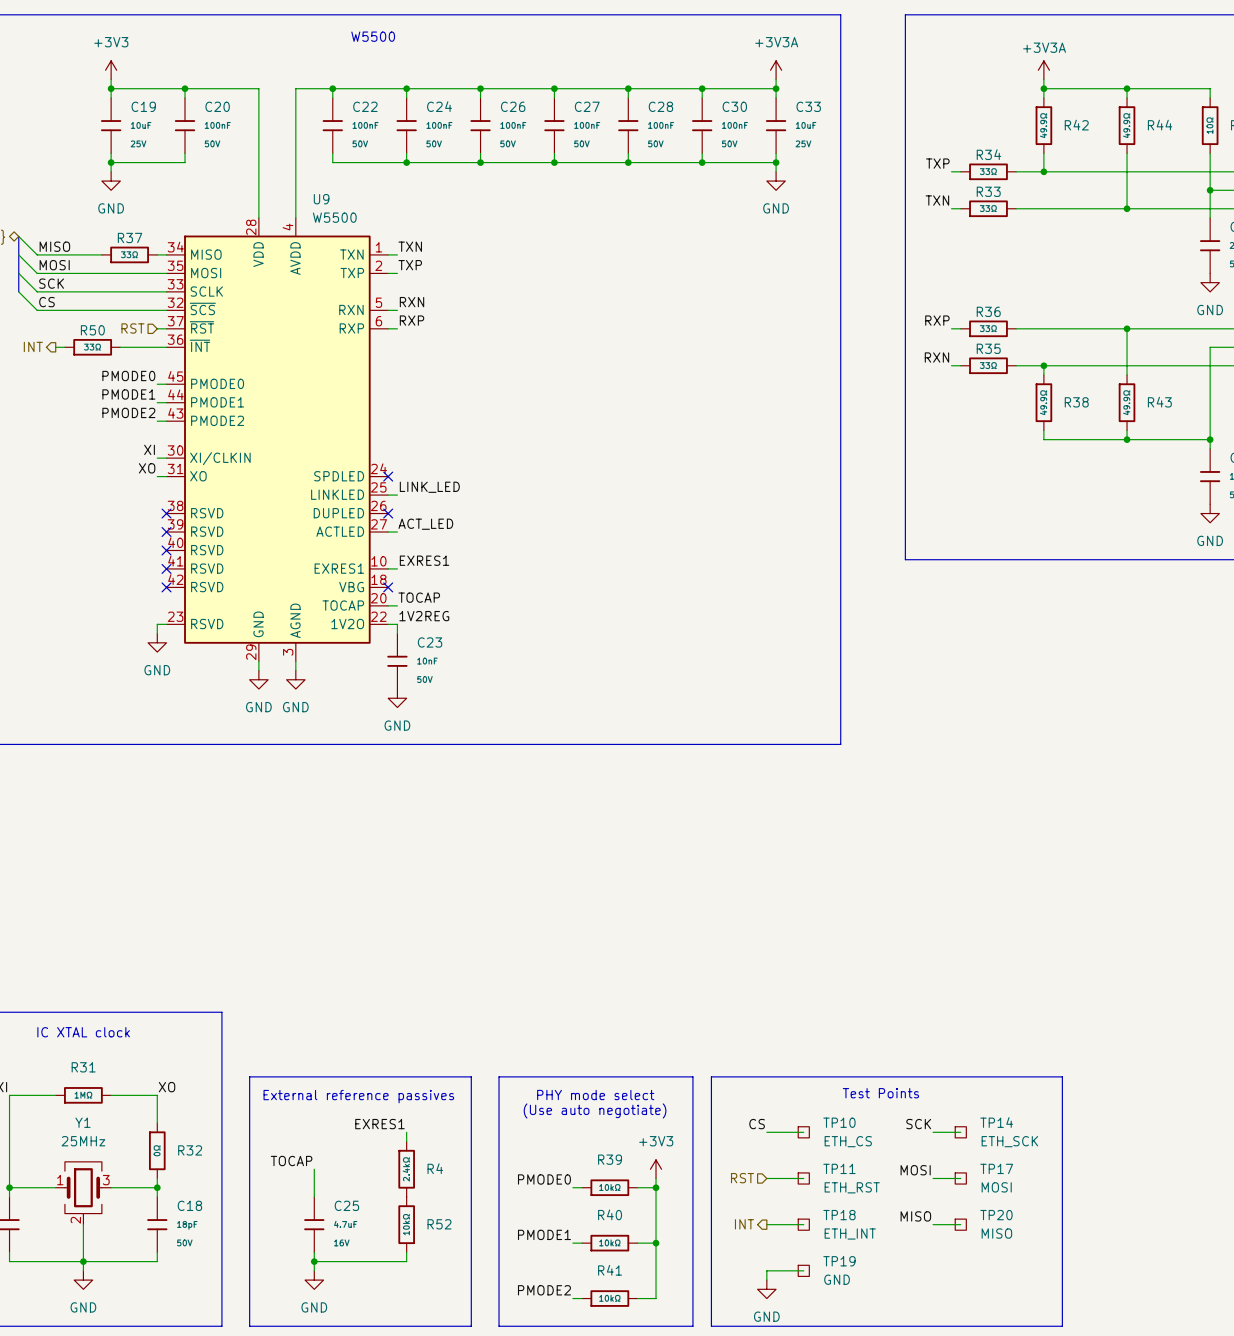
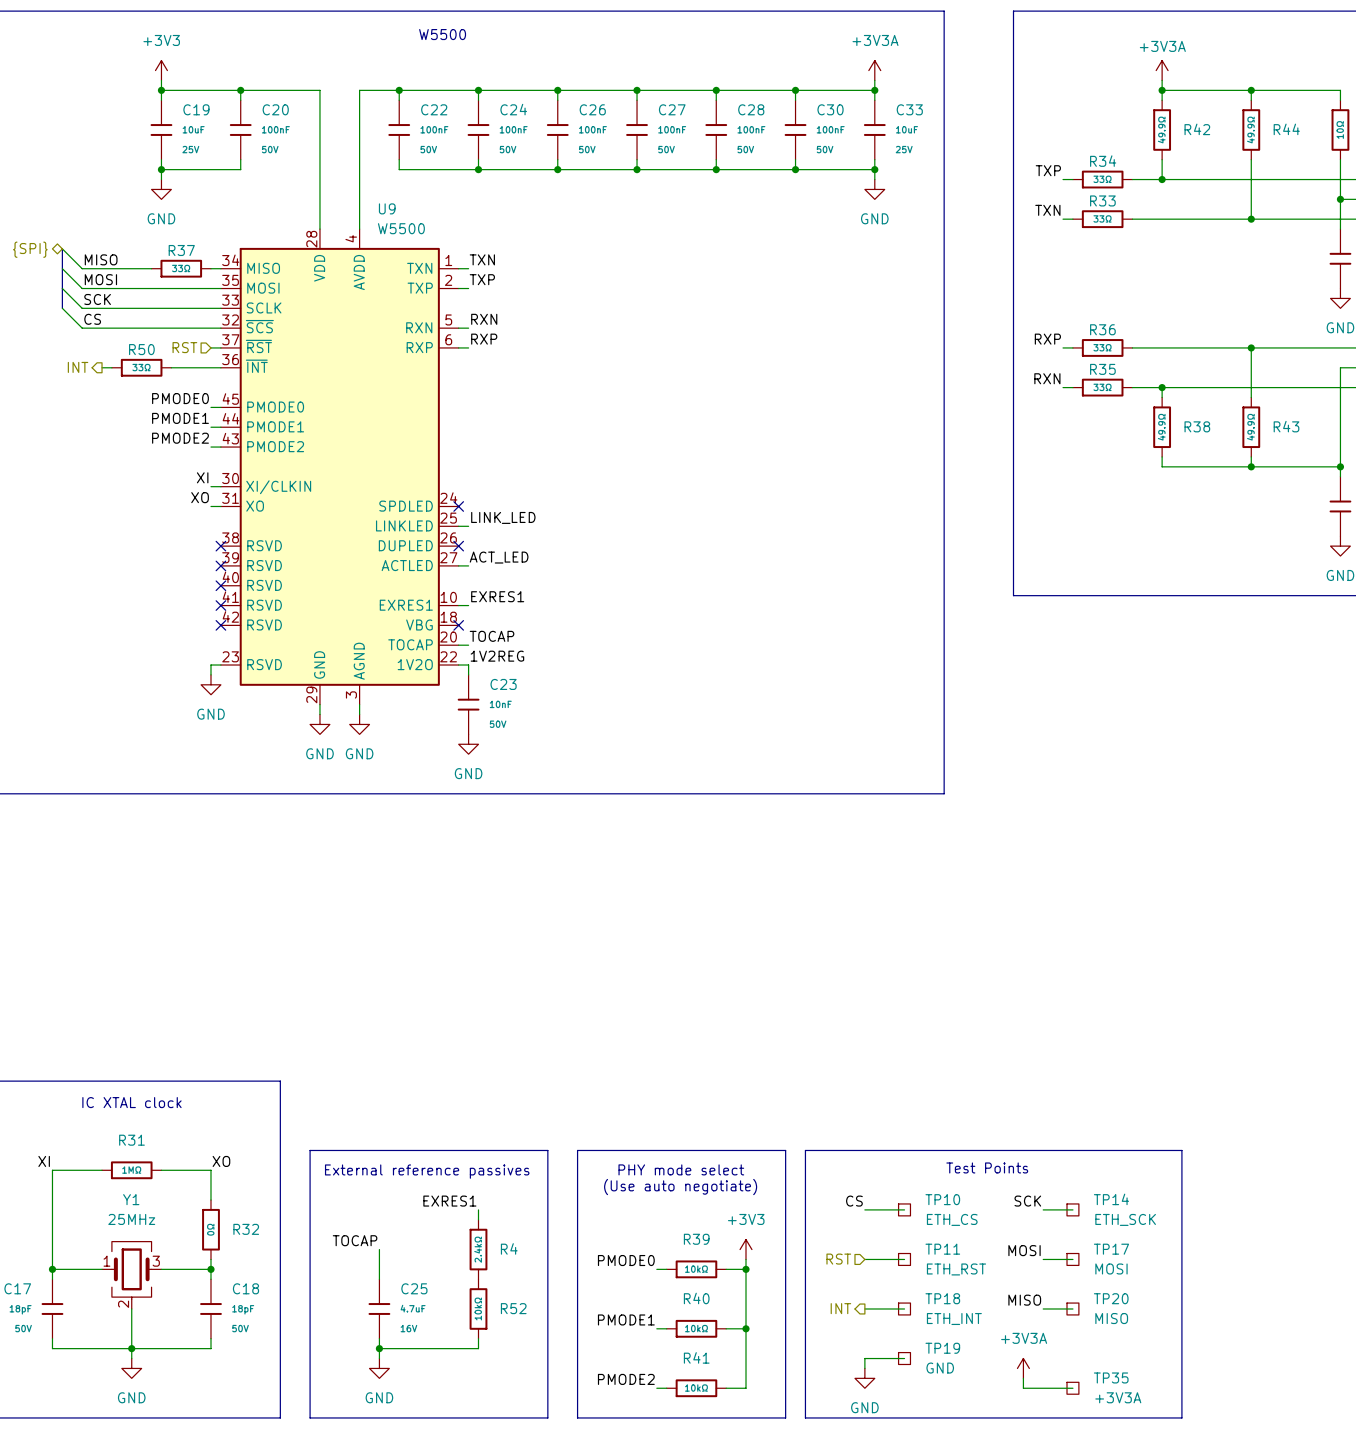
power symbol: none -> +3V3A (1023, 1368)
wire: none -> (1023, 1378) (1023, 1388) (1072, 1388)
TP35: none -> +3V3A (1072, 1388)

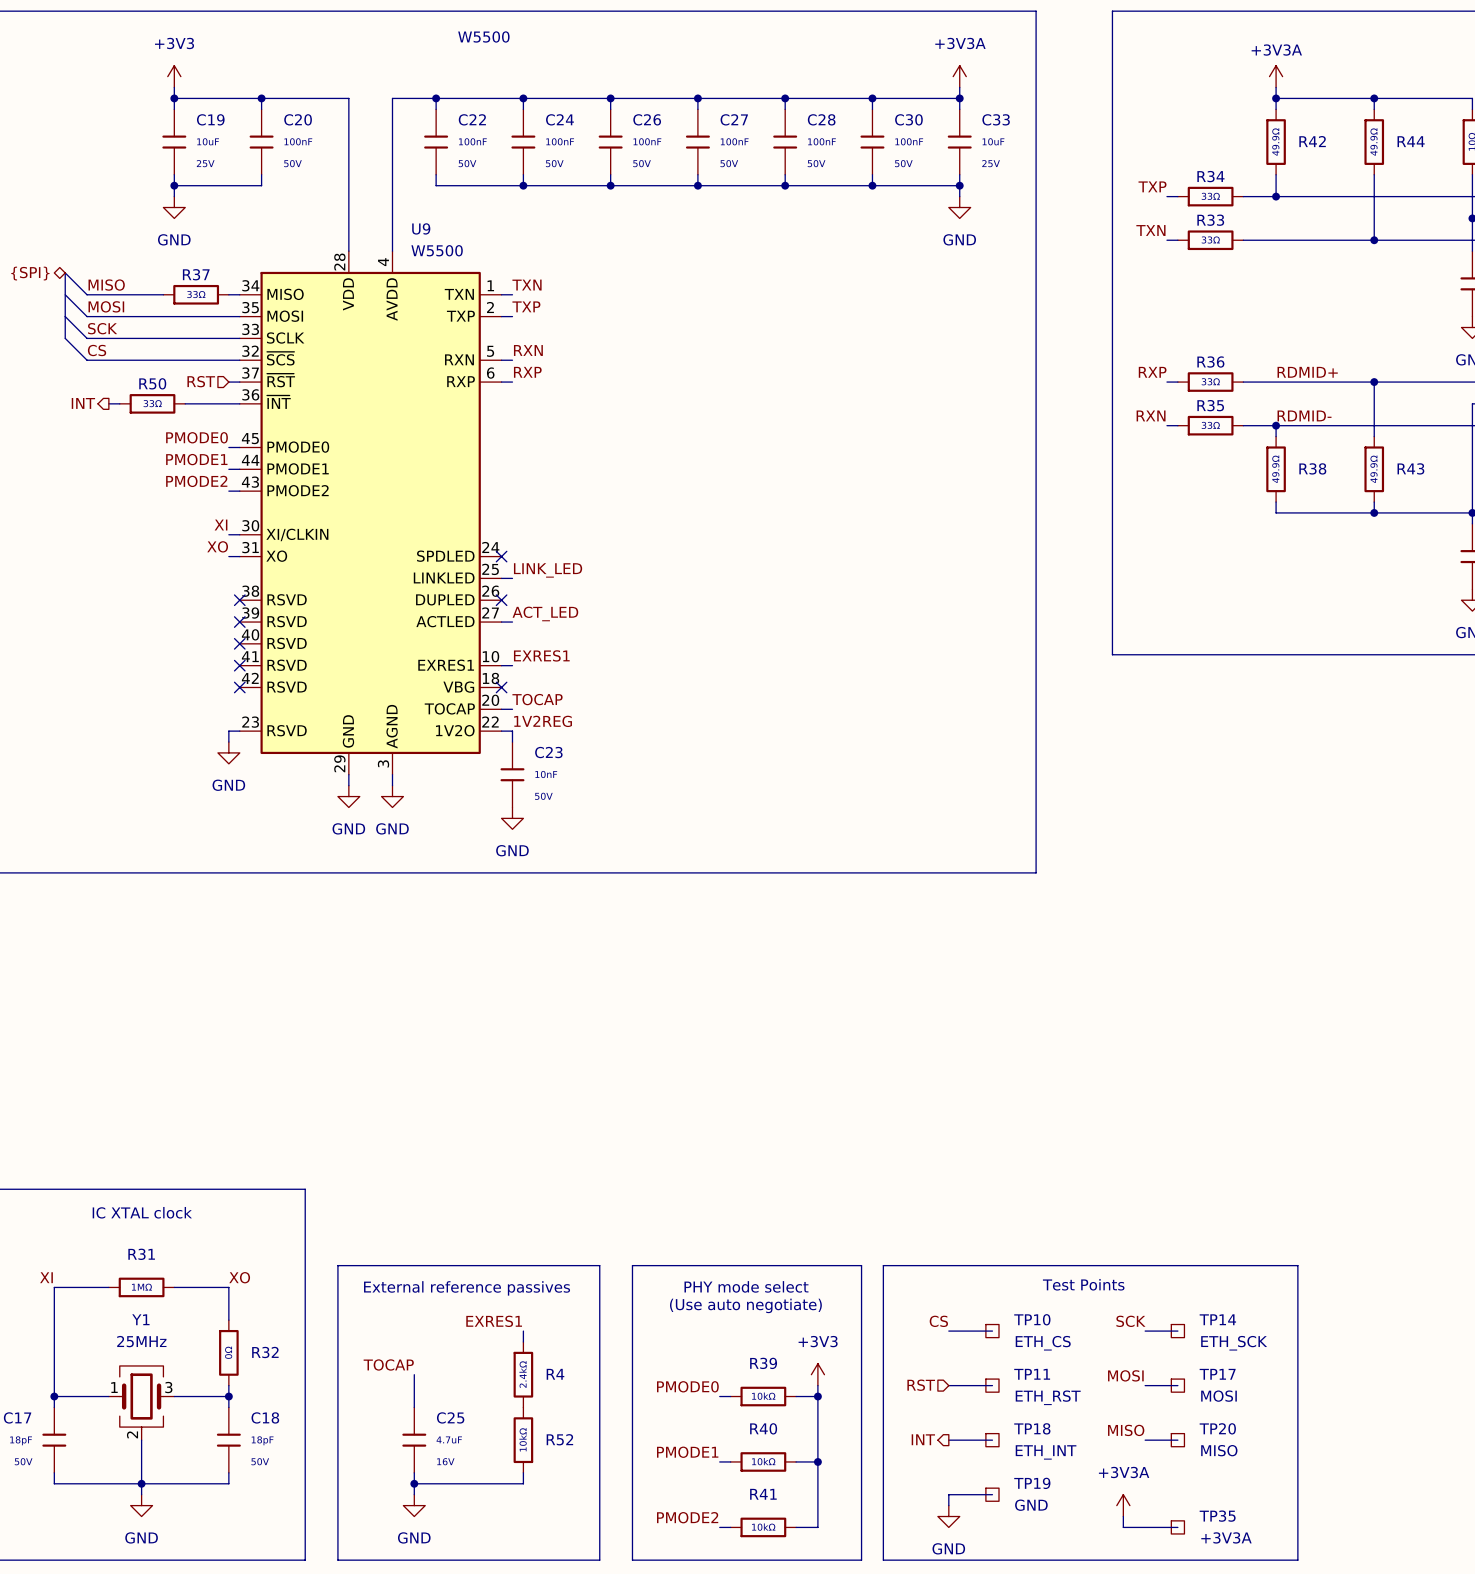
label: none -> RDMID+ (1307, 372)
label: none -> RDMID- (1304, 415)

